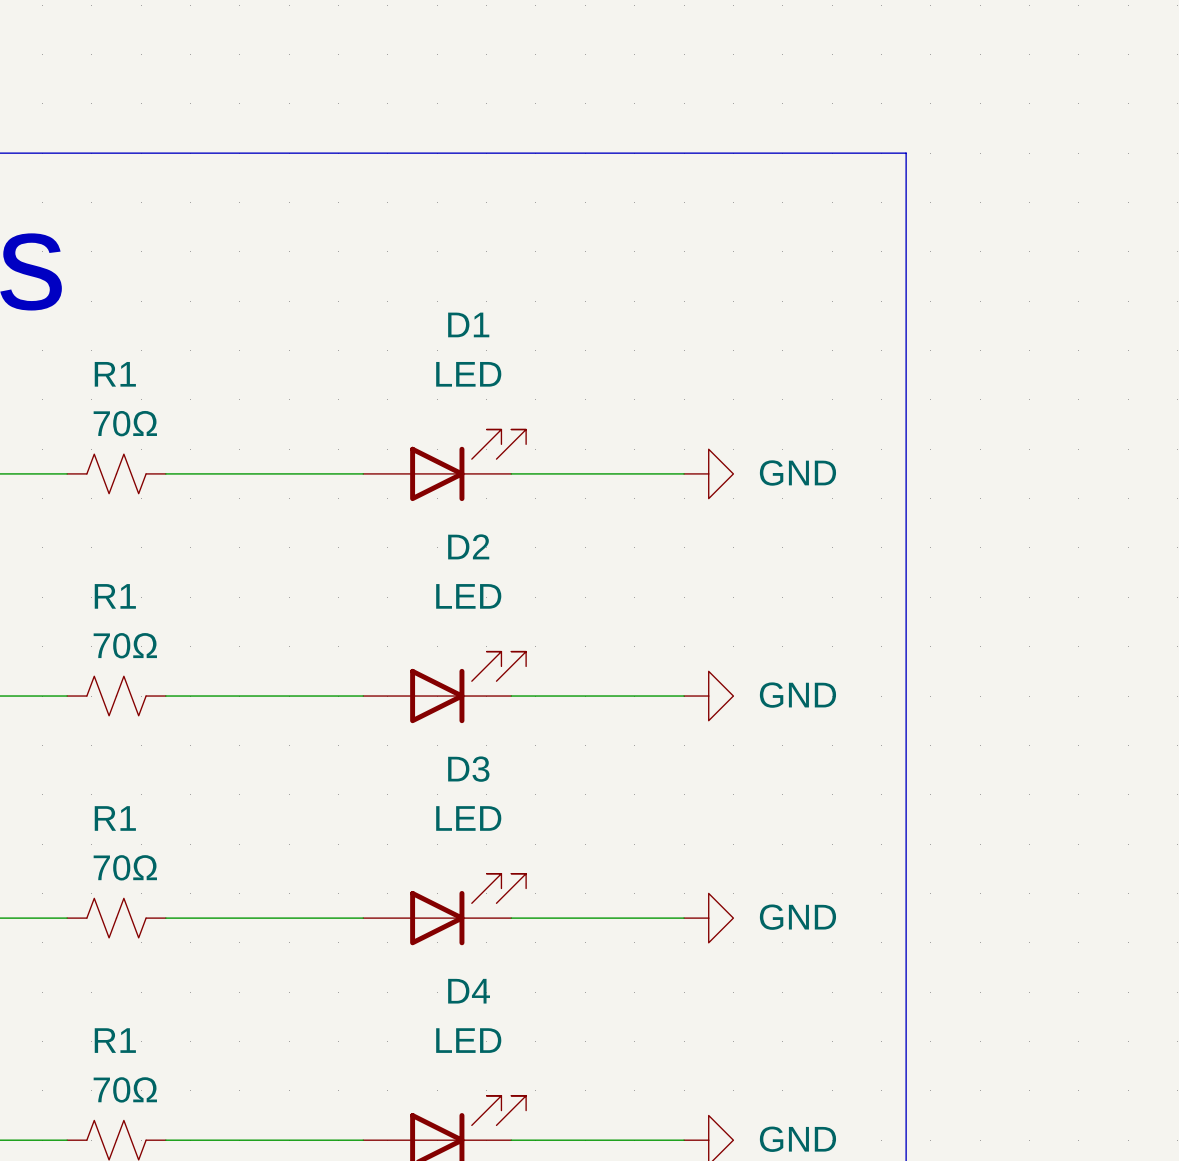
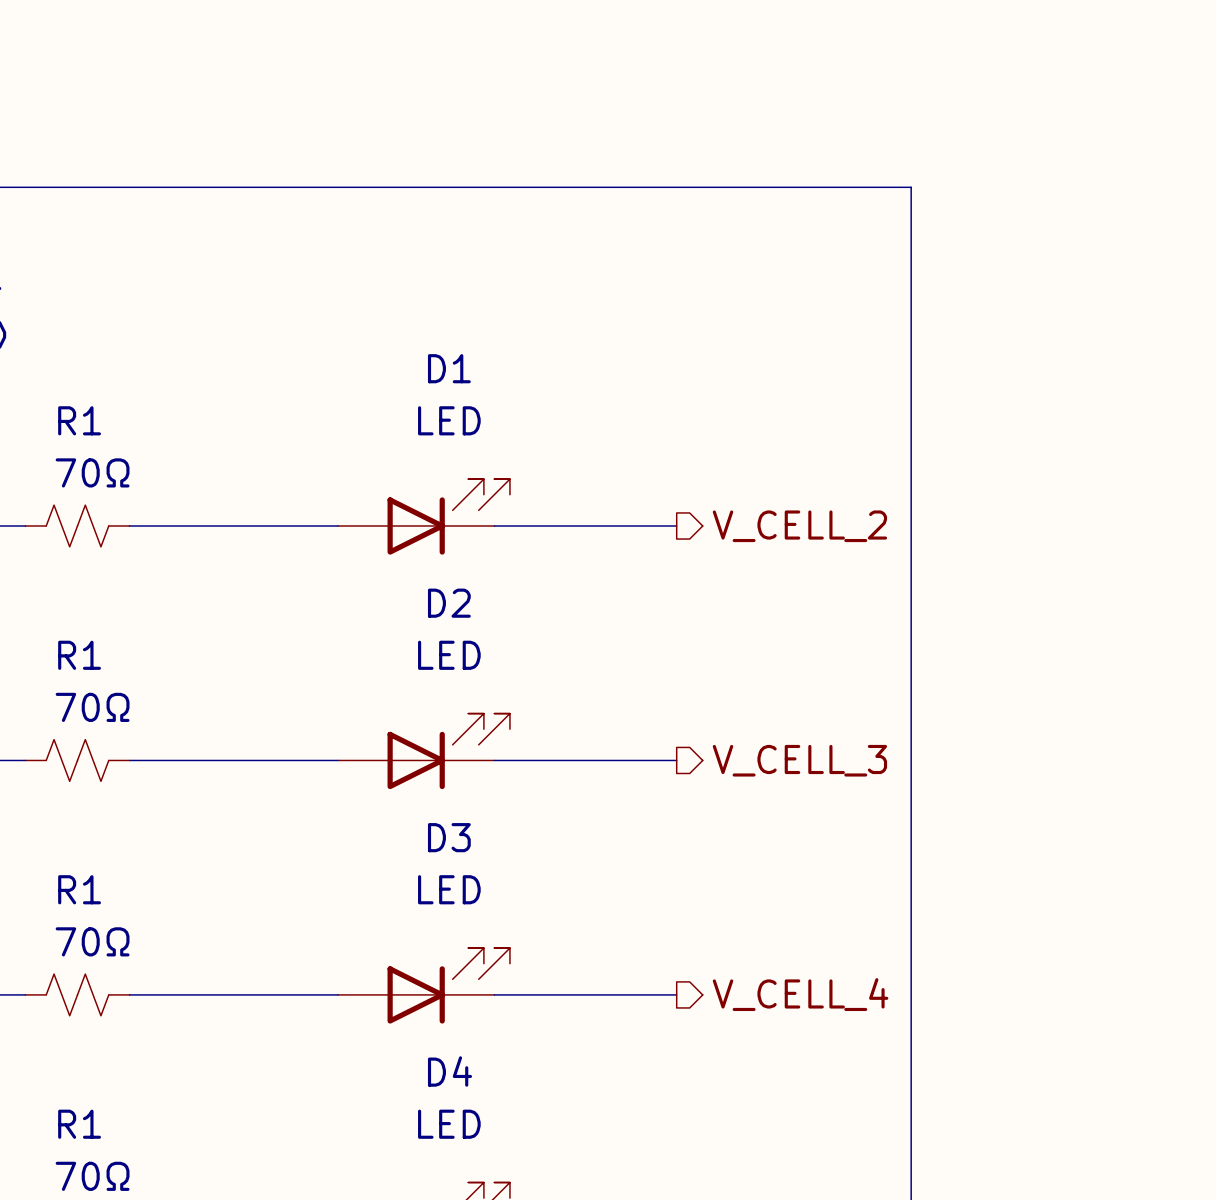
power symbol: GND (708, 473) -> none
hierarchical label: none -> V_CELL_2 (799, 526)
power symbol: GND (708, 696) -> none
hierarchical label: none -> V_CELL_3 (799, 760)
power symbol: GND (708, 918) -> none
hierarchical label: none -> V_CELL_4 (800, 994)

